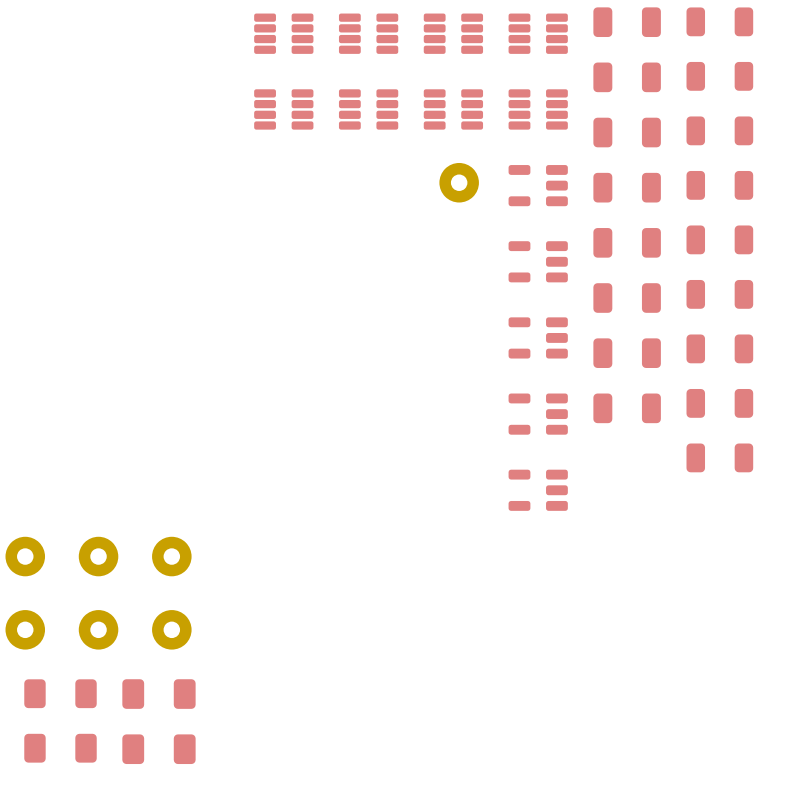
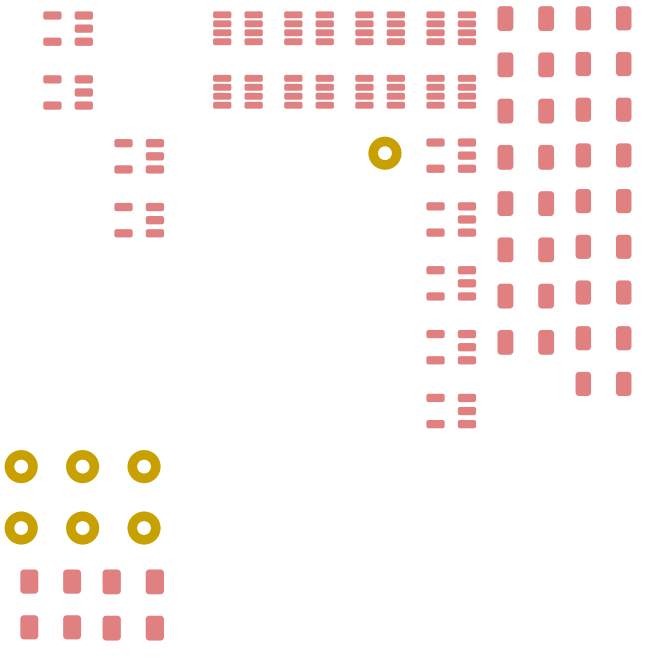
part: none -> (68, 28)
part: none -> (68, 92)
part: none -> (139, 156)
part: none -> (139, 220)

